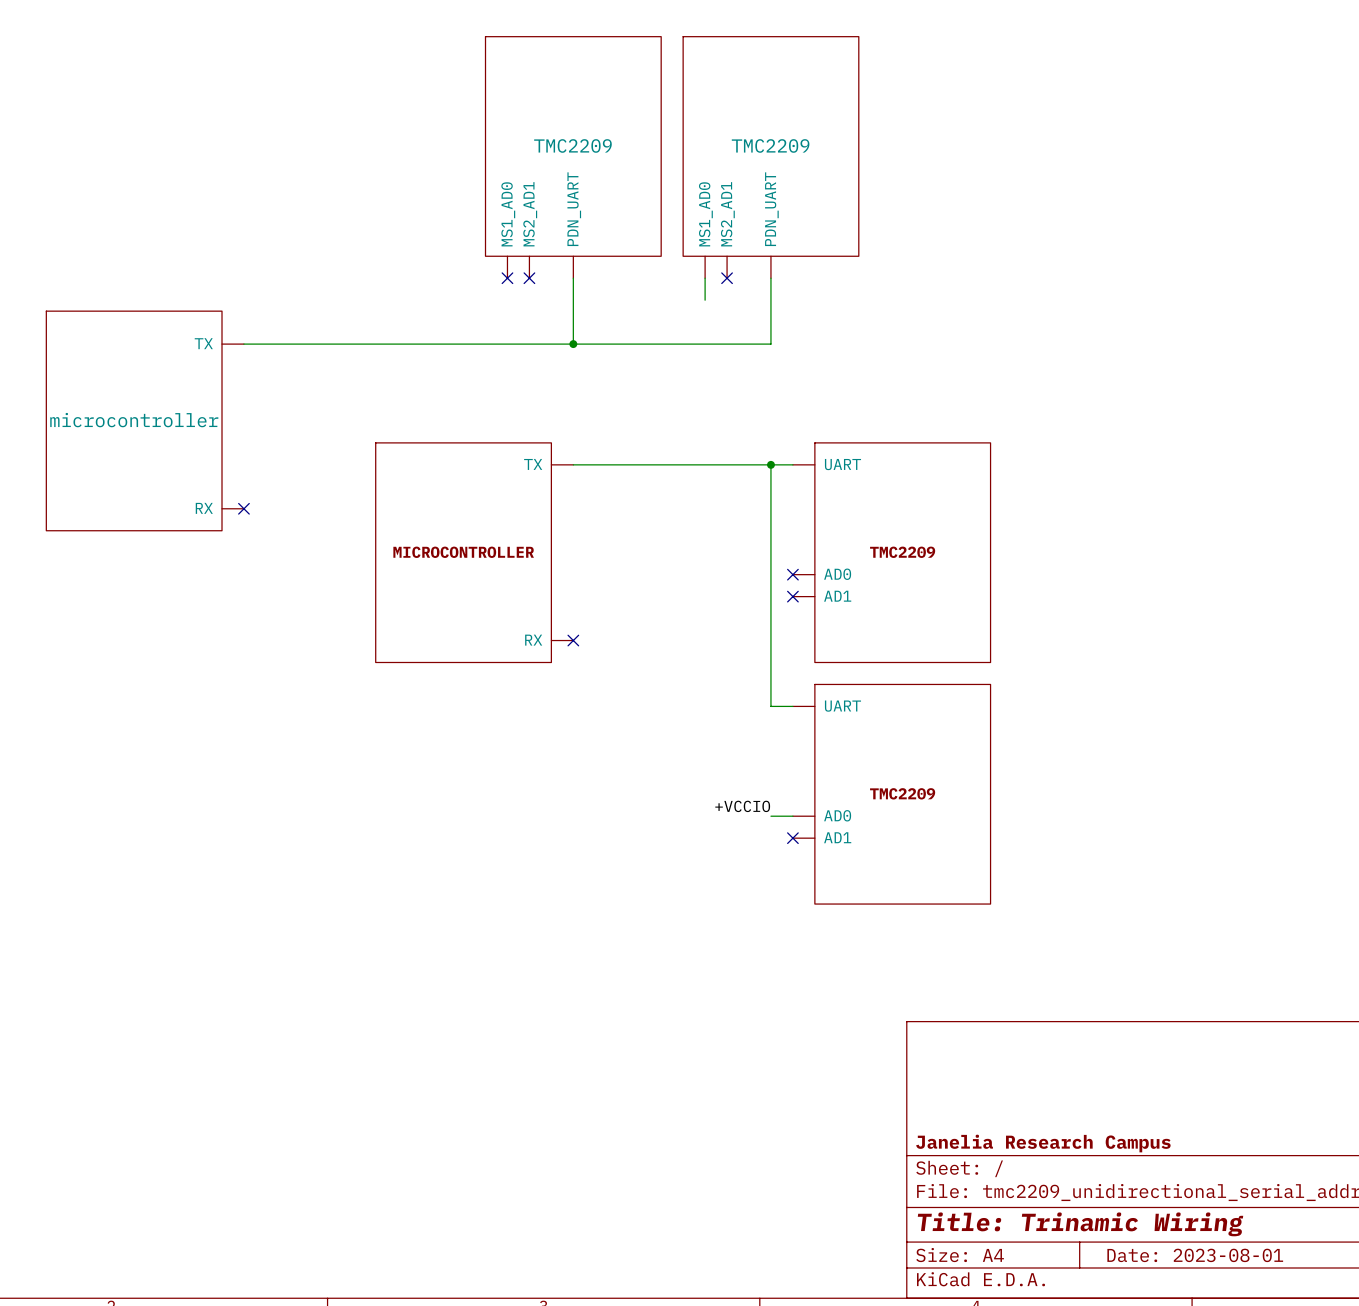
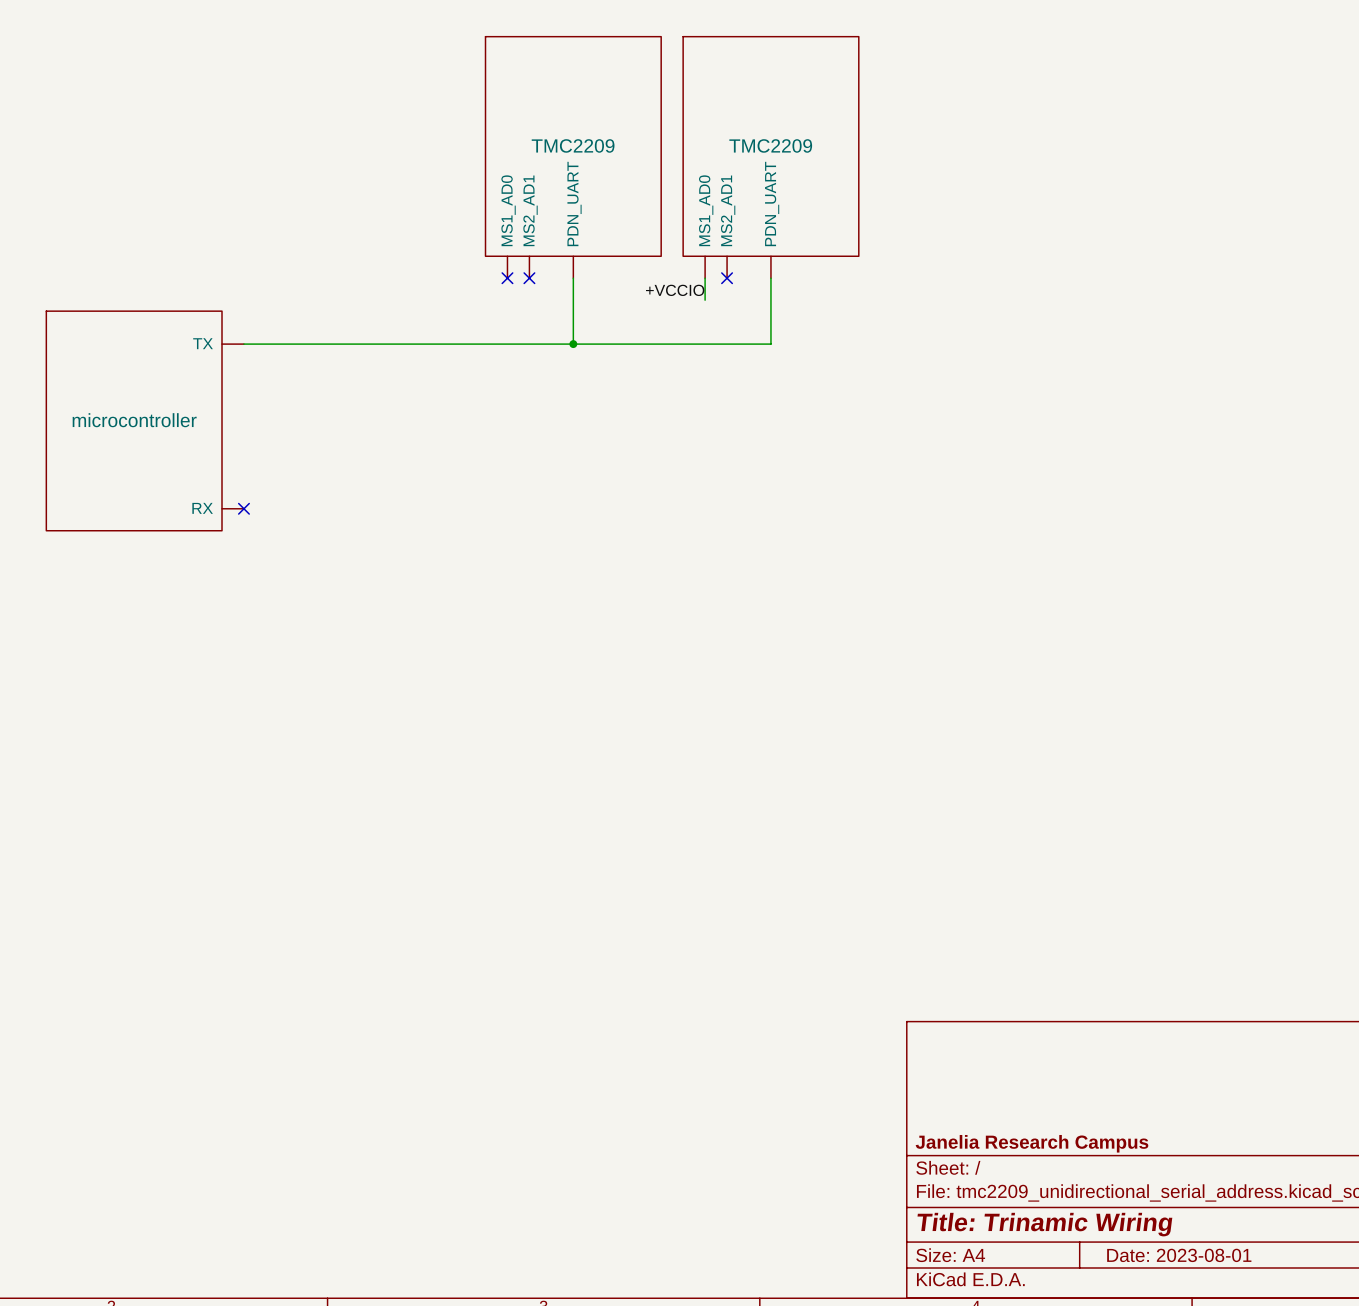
label: none -> +VCCIO (675, 290)
wire: (573, 464) (792, 464) -> none
wire: (770, 464) (770, 706) (792, 706) -> none
junction: (770, 464) -> none
part: (474, 552) -> none
part: (891, 552) -> none
no-connect mark: (792, 574) -> none
no-connect mark: (792, 596) -> none
no-connect mark: (573, 640) -> none
part: (891, 794) -> none
label: +VCCIO (742, 806) -> none
wire: (770, 816) (792, 816) -> none
no-connect mark: (792, 838) -> none

